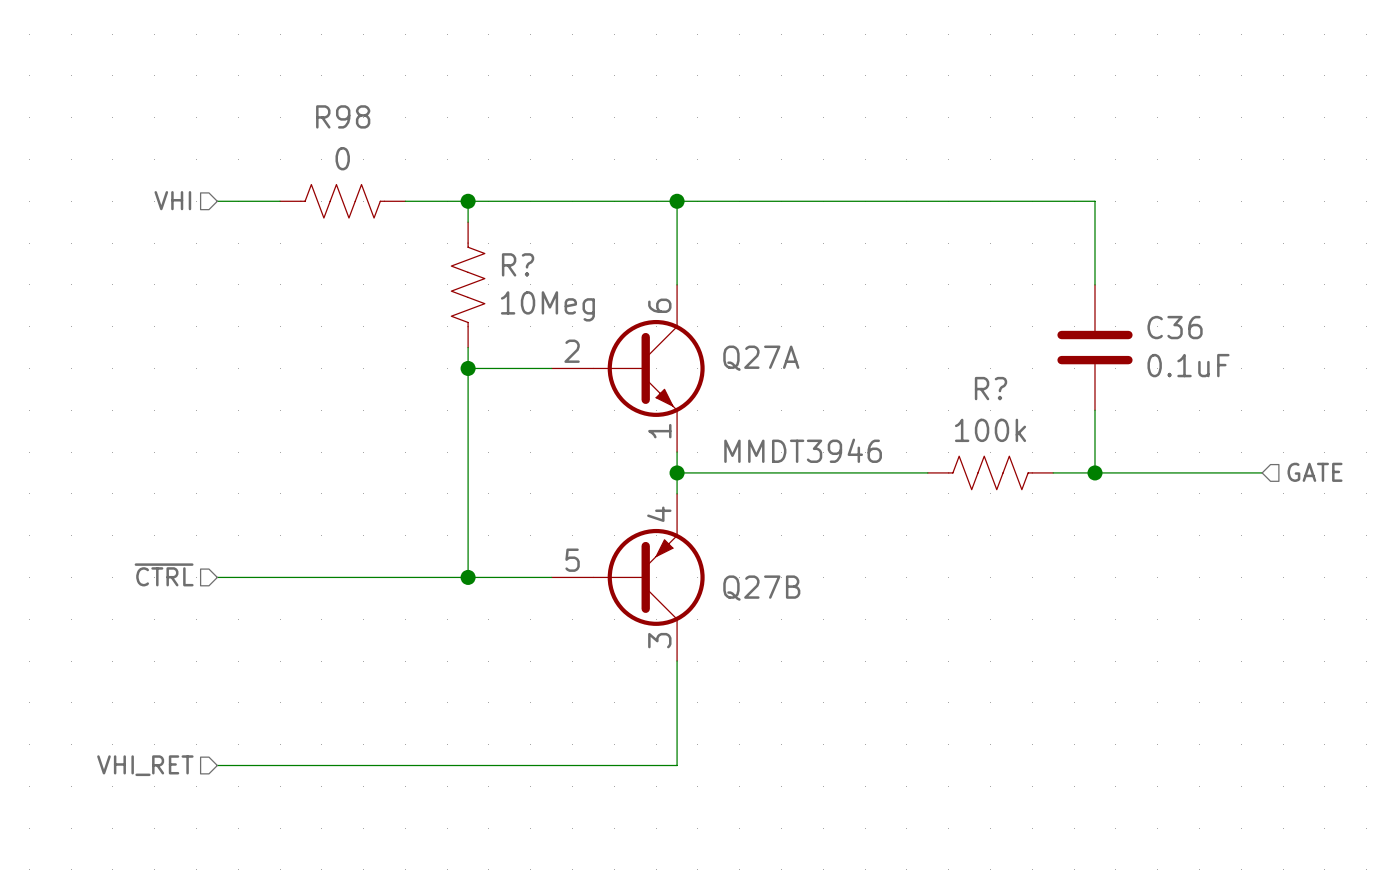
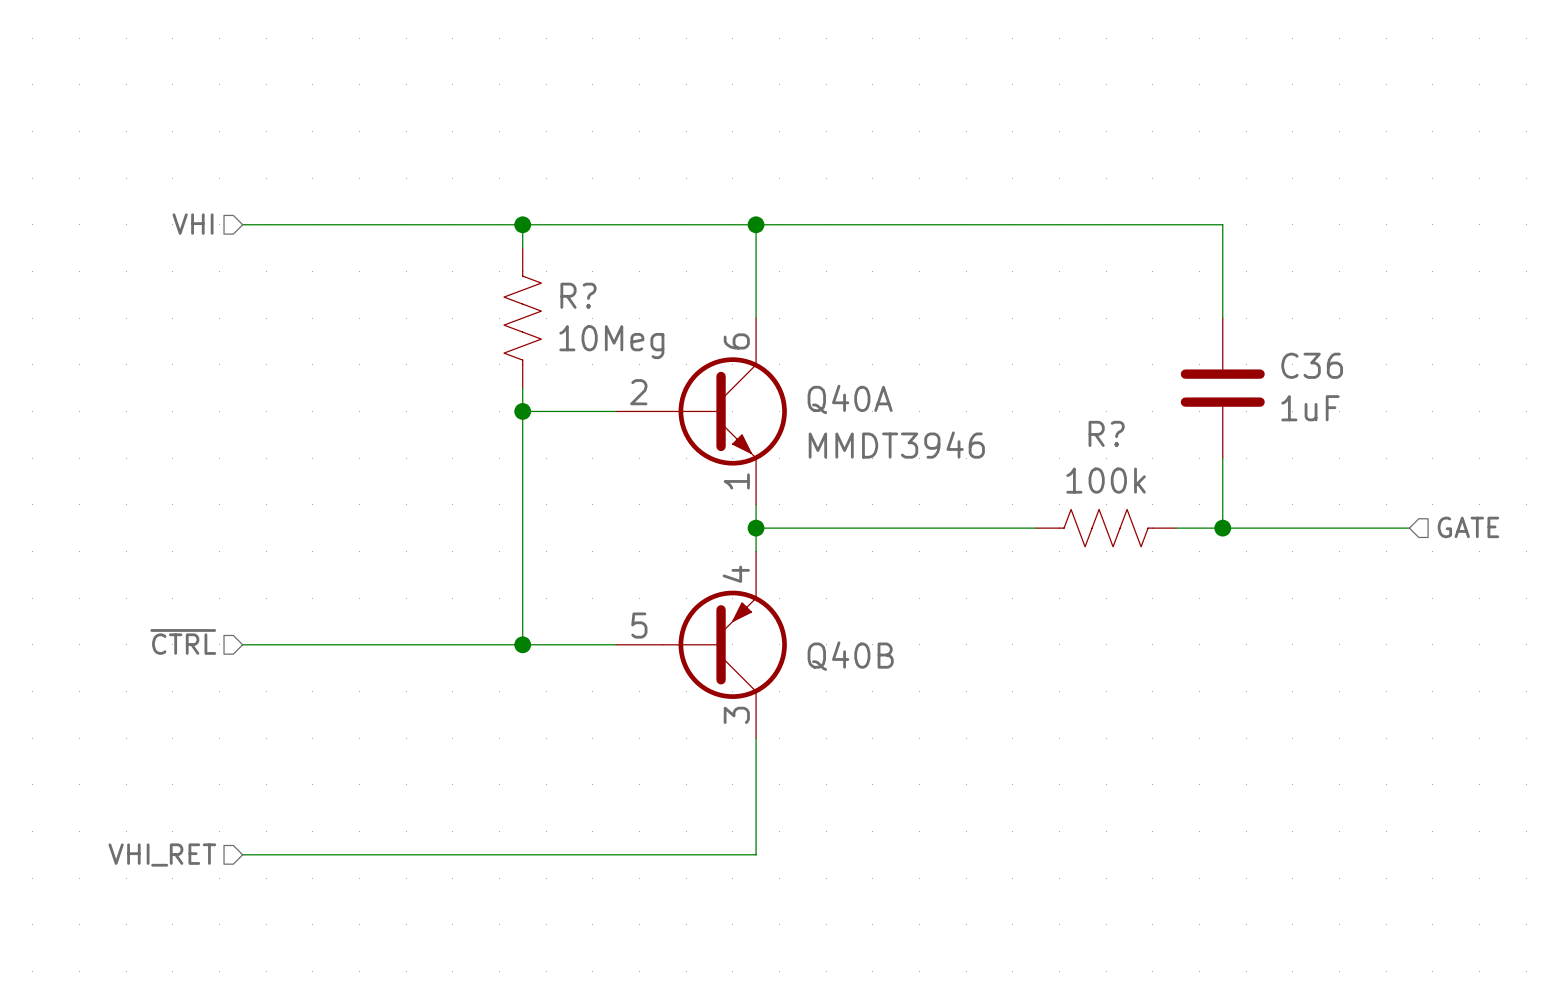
wire: none -> (312, 224) (452, 224)
R98: 0 (342, 201) -> none
Q27A name: Q27A (761, 358) -> Q40A (850, 399)
C36 value: 0.1uF (1188, 365) -> 1uF (1310, 408)
Q27A value position: MMDT3946 (803, 450) -> MMDT3946 (896, 445)
Q27B name: Q27B (761, 588) -> Q40B (850, 656)

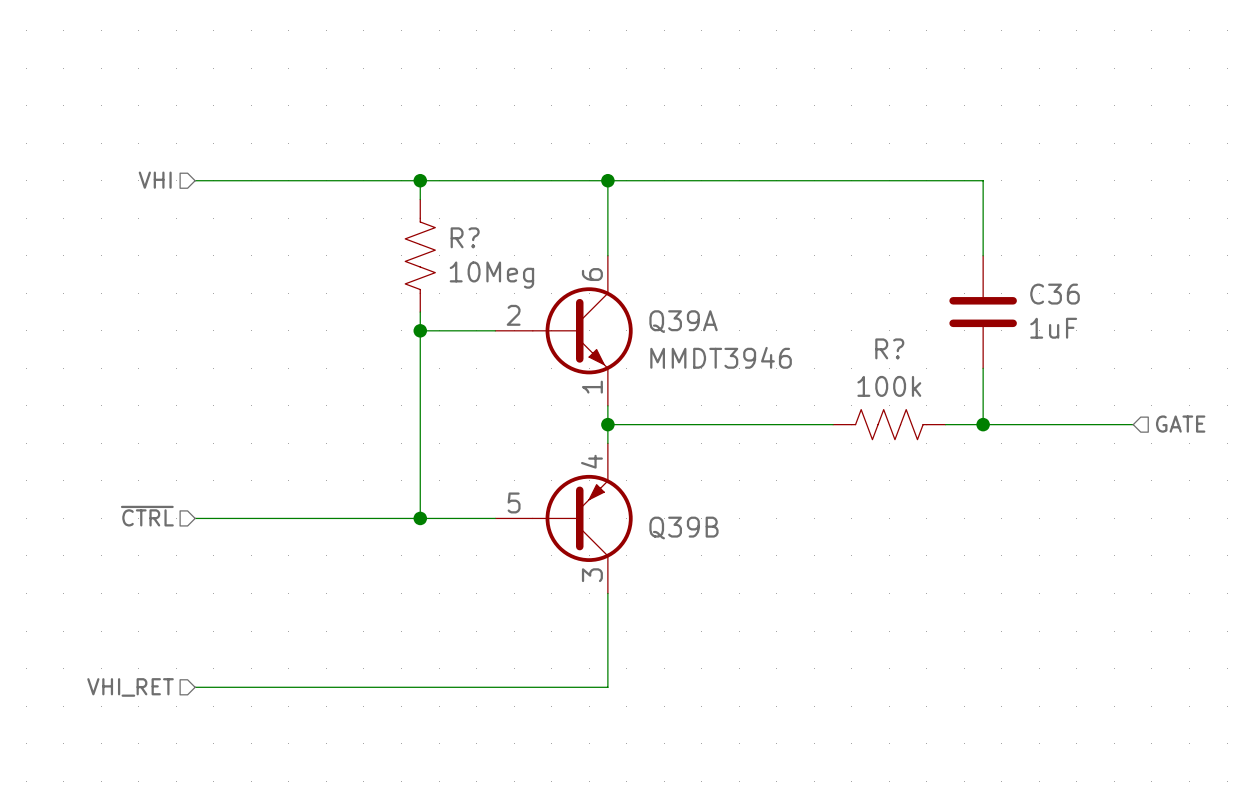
Q40A name: Q40A (850, 399) -> Q39A (683, 321)
Q40B name: Q40B (850, 656) -> Q39B (683, 528)

